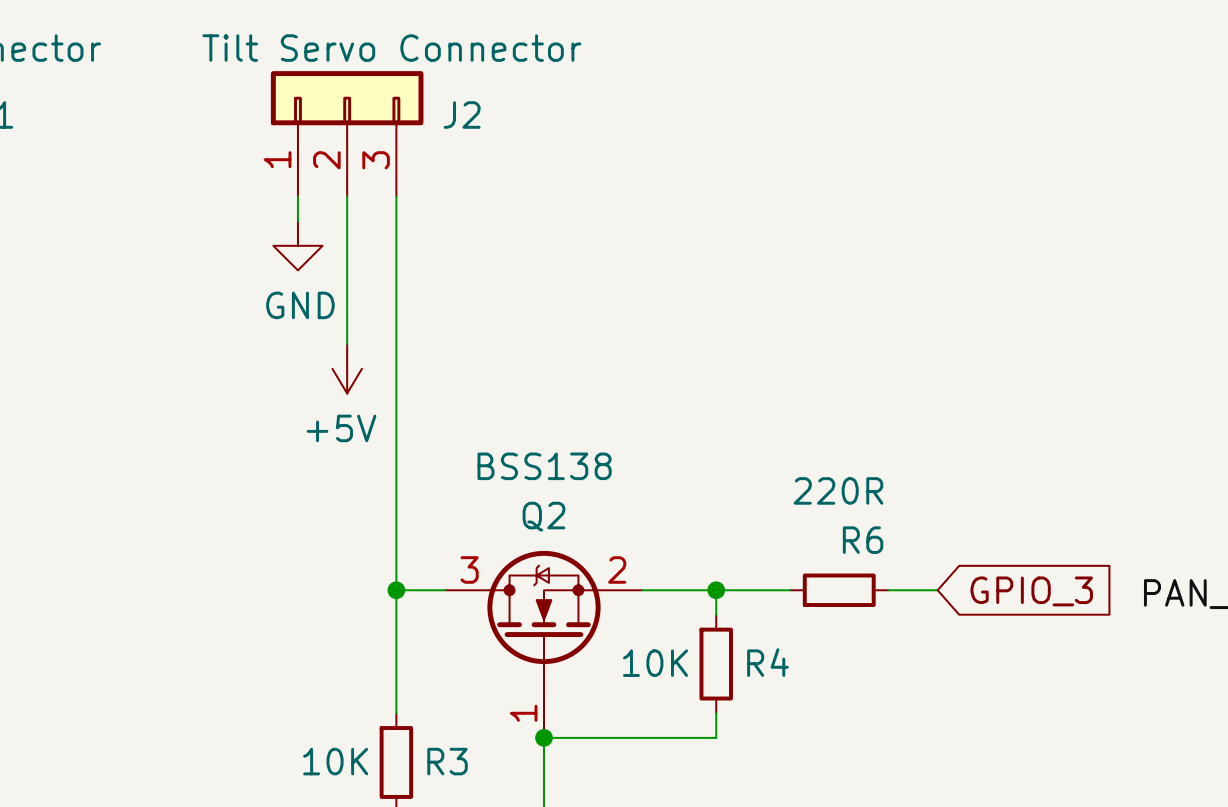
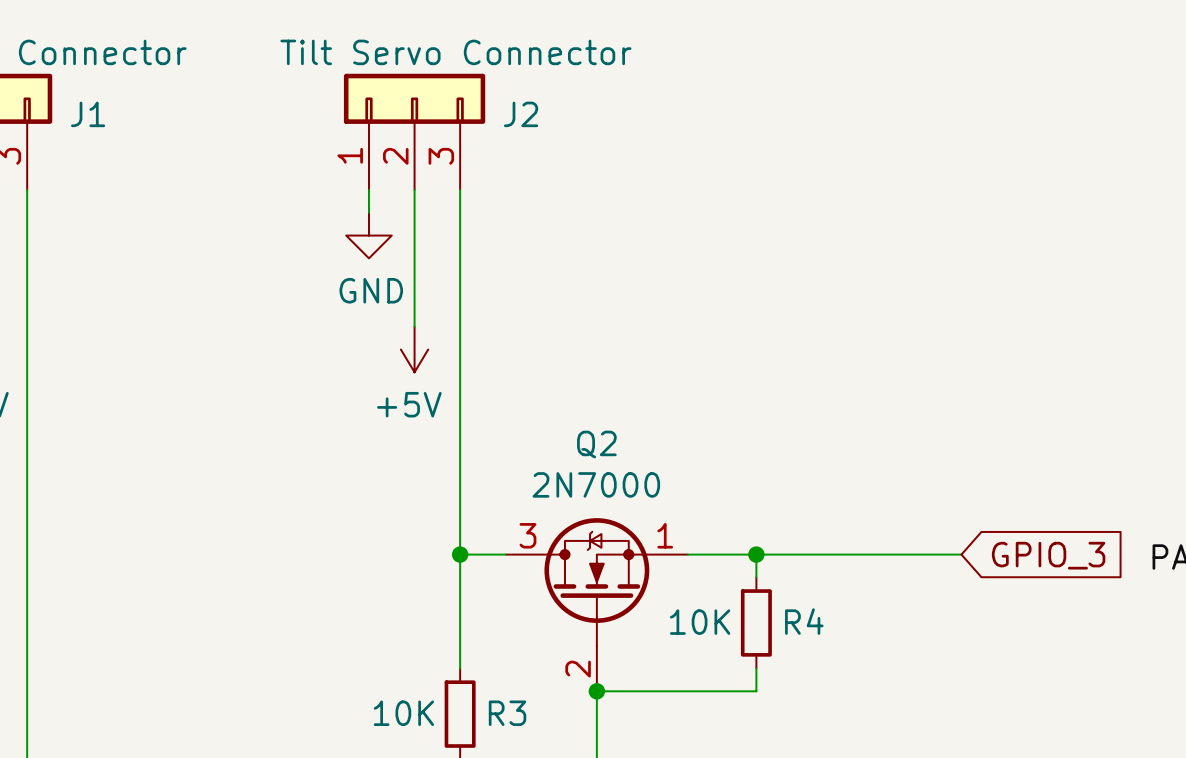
Q2 value: BSS138 (544, 466) -> 2N7000 (596, 484)
Q2 name position: Q2 (544, 516) -> Q2 (596, 444)
Q2 pin number: 2 (617, 569) -> 1 (665, 535)
wire: none -> (824, 554) (915, 554)
R6: 220R (839, 590) -> none
Q2 pin number: 1 (523, 713) -> 2 (578, 669)

